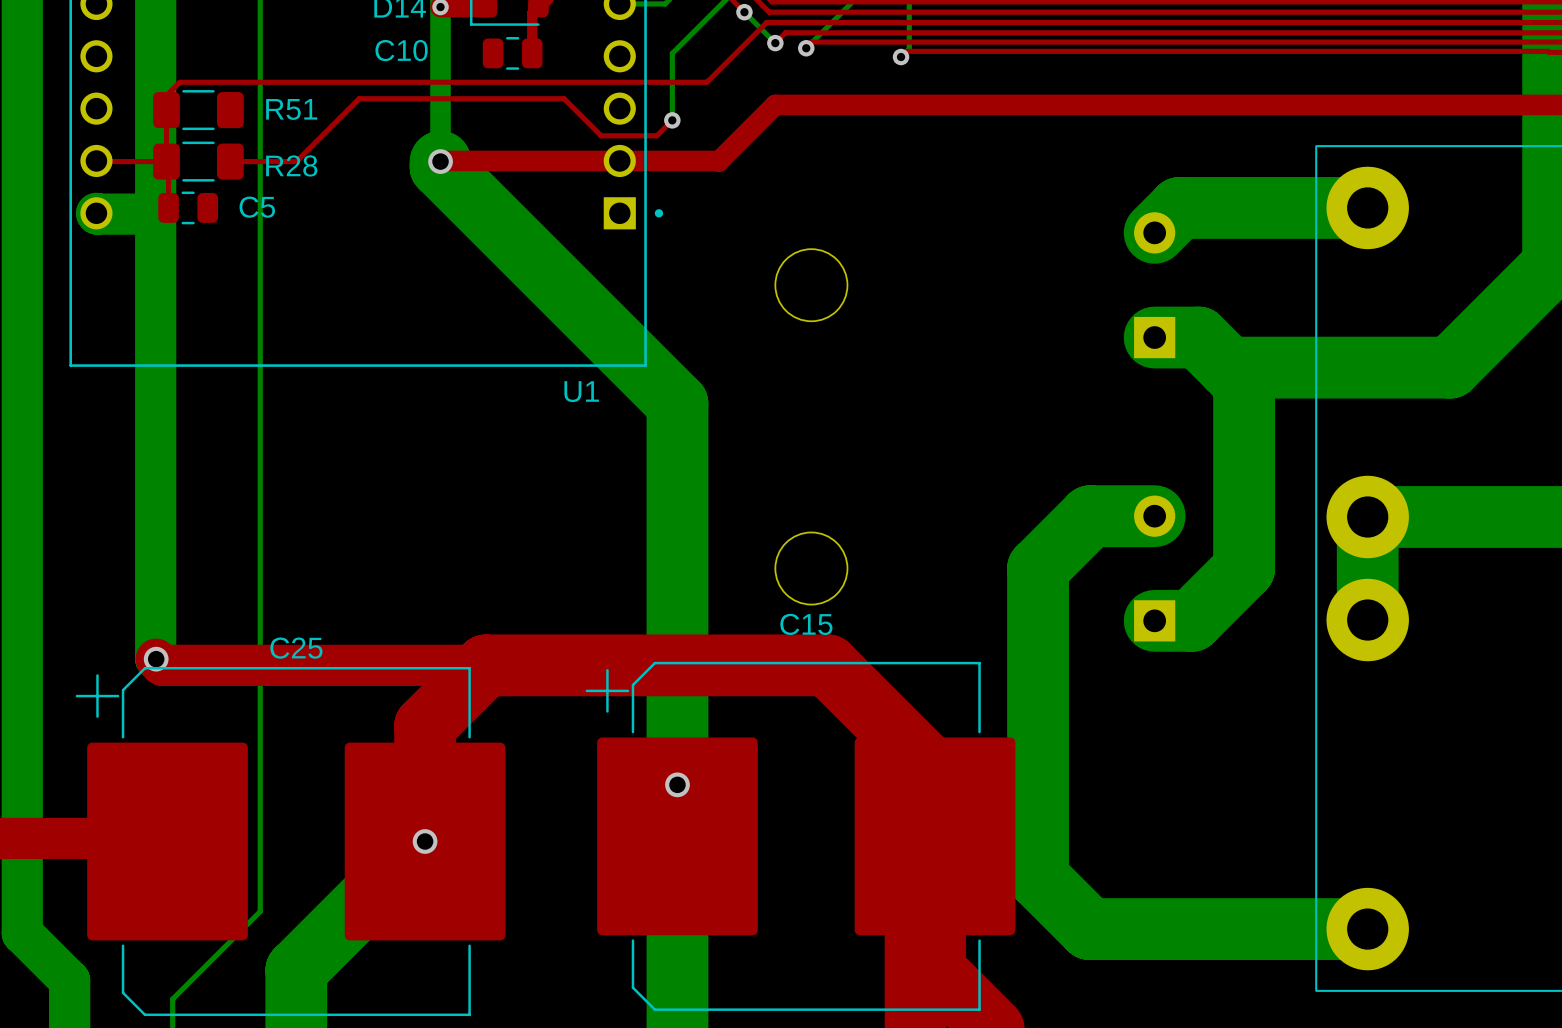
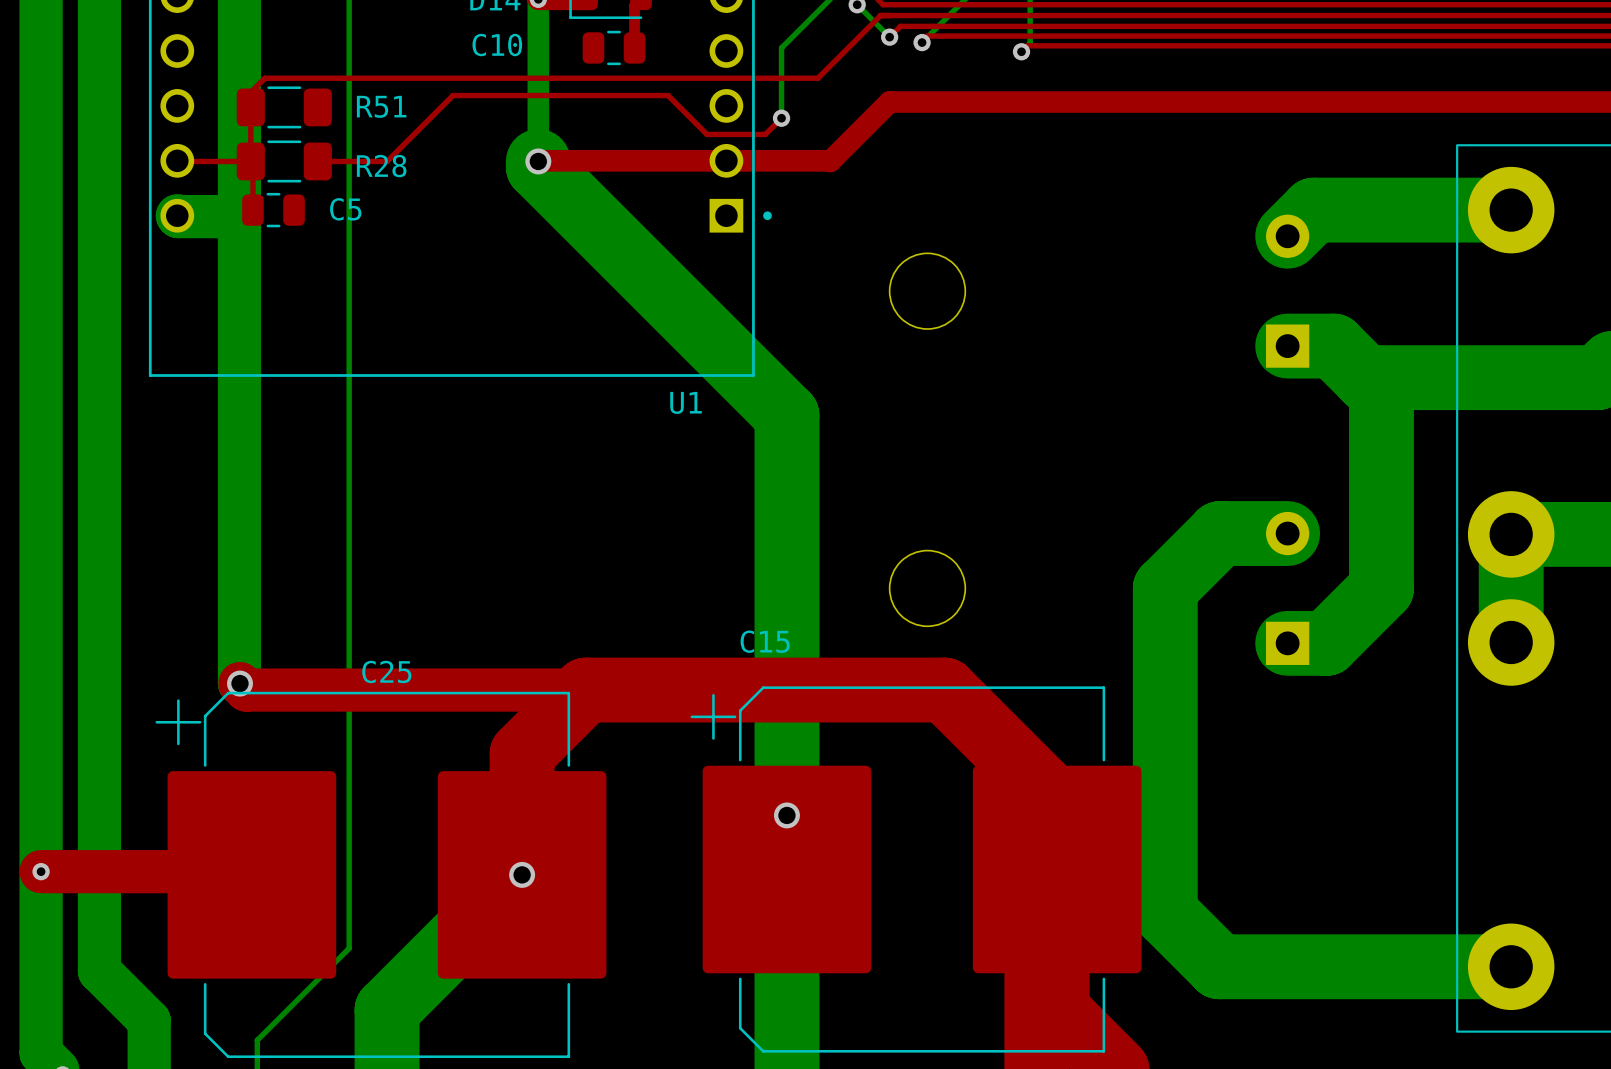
C15 name position: C15 (806, 624) -> C15 (765, 641)

